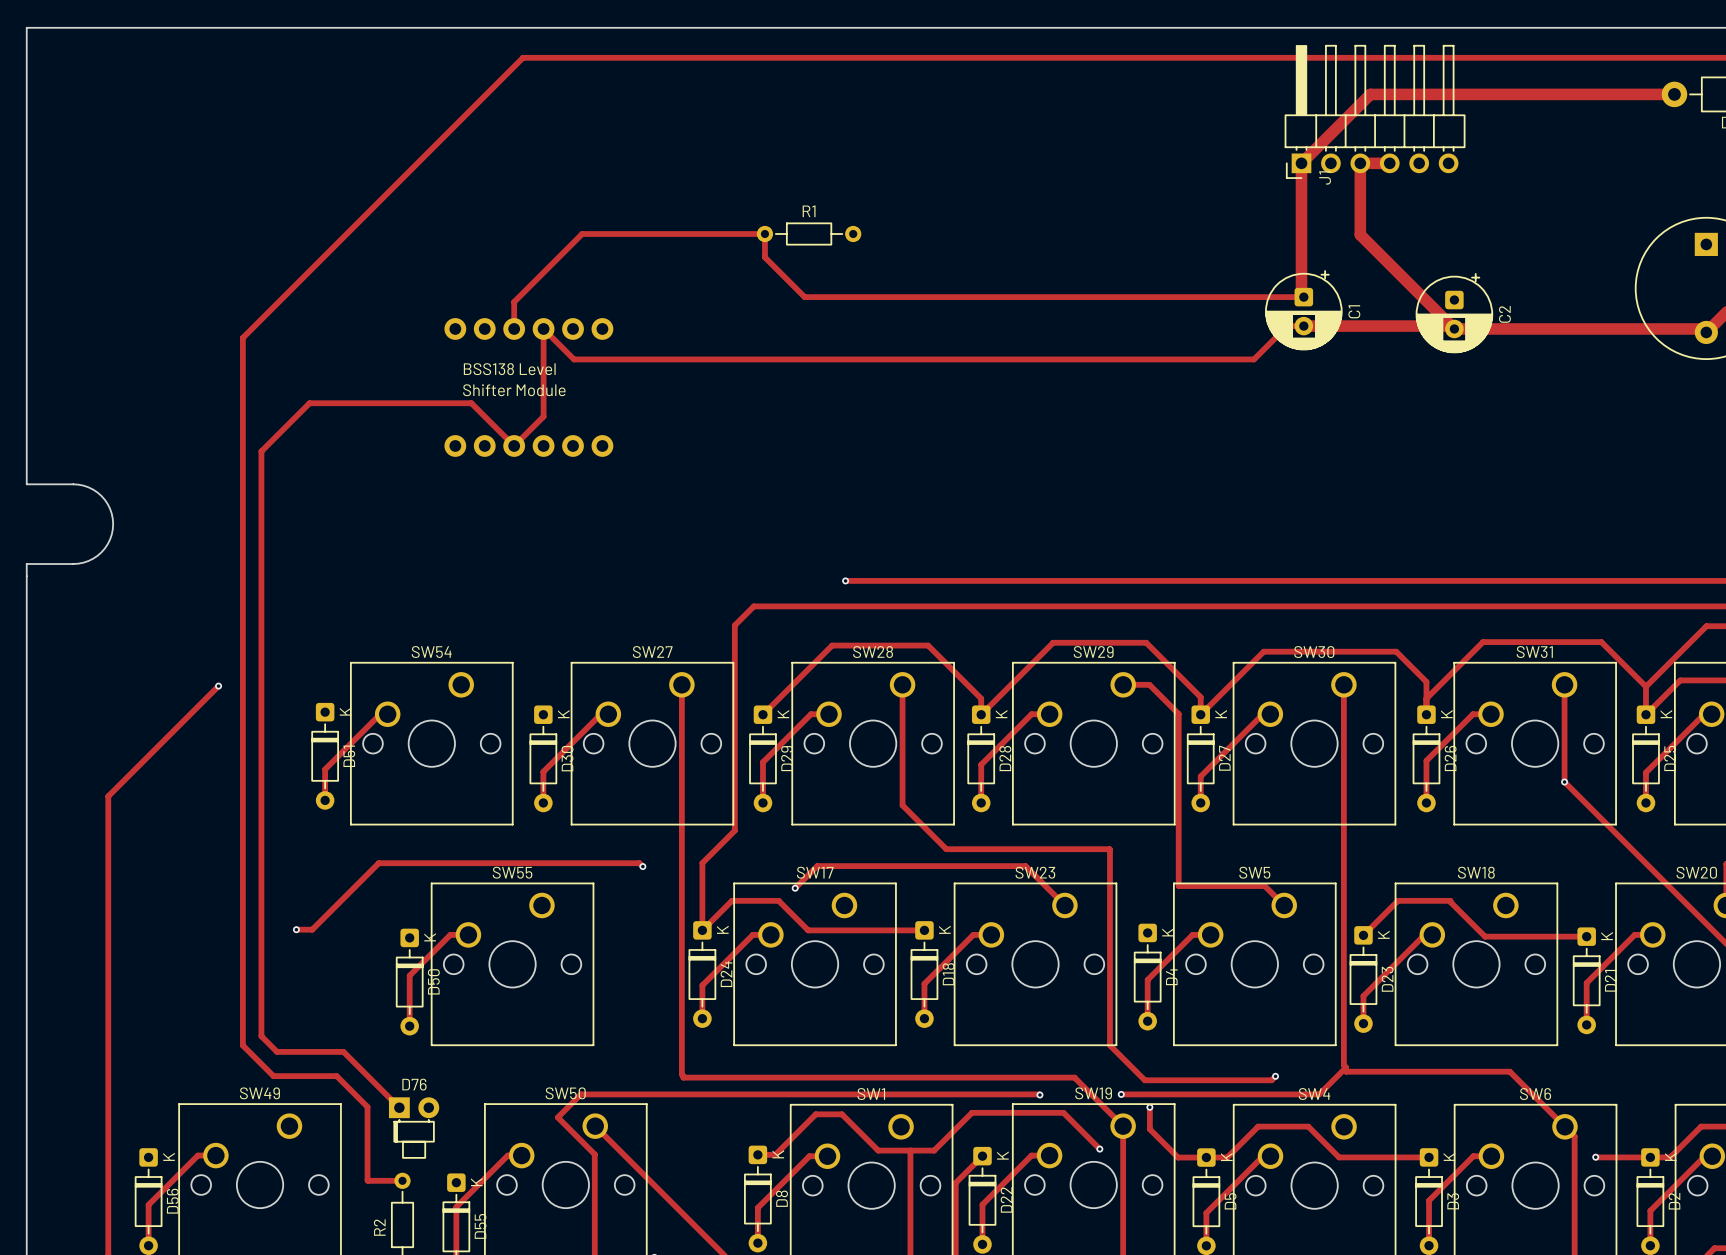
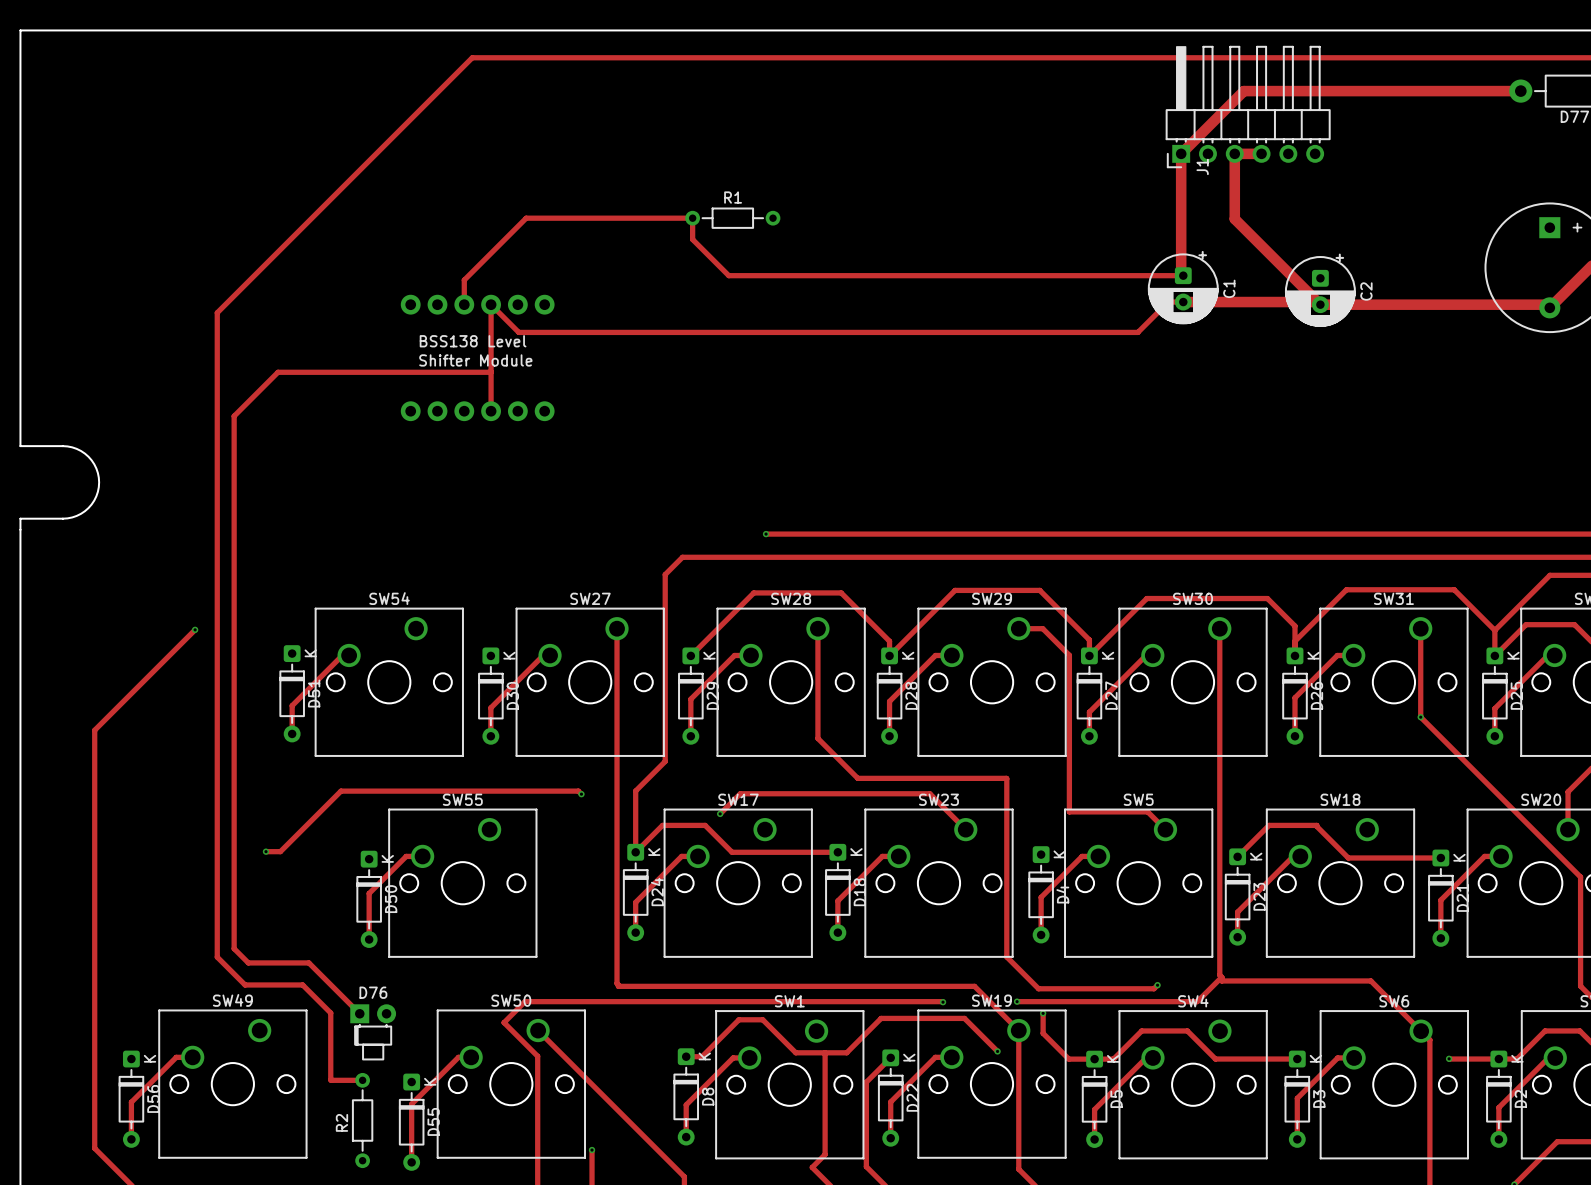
track: (471, 403) (514, 445) (543, 416) -> (425, 372) (491, 371)
track: none -> (491, 384) (491, 411)

